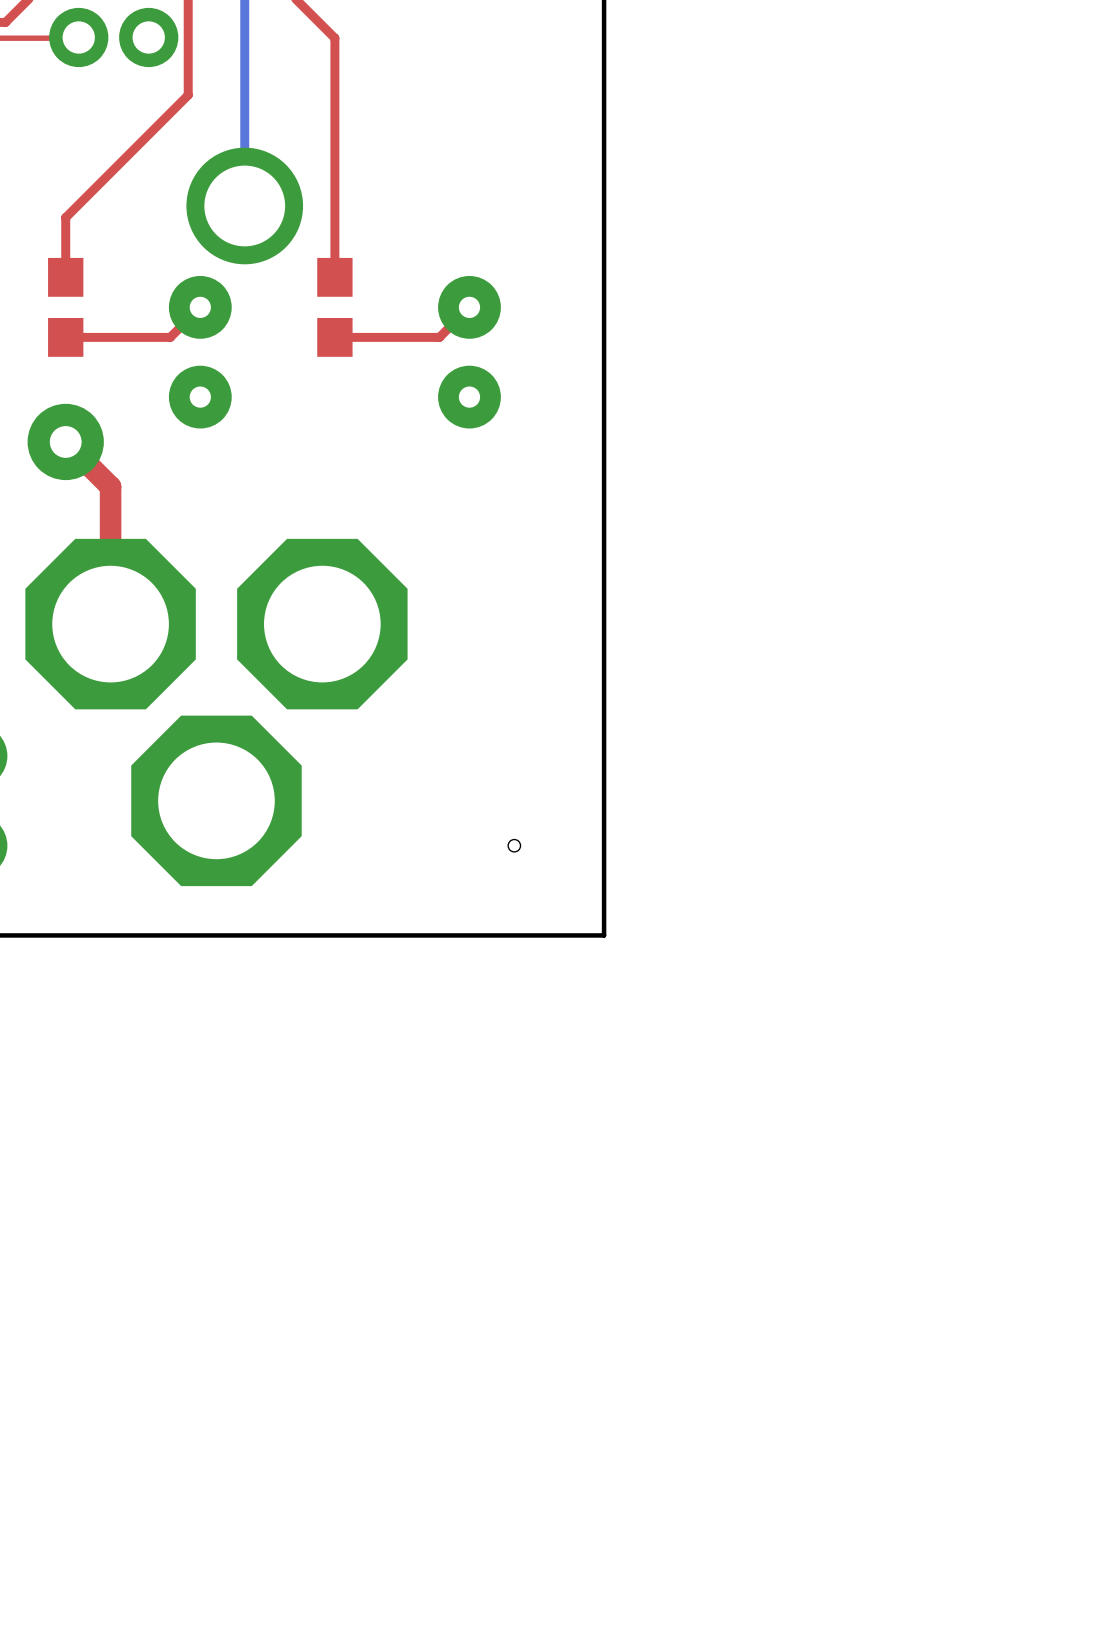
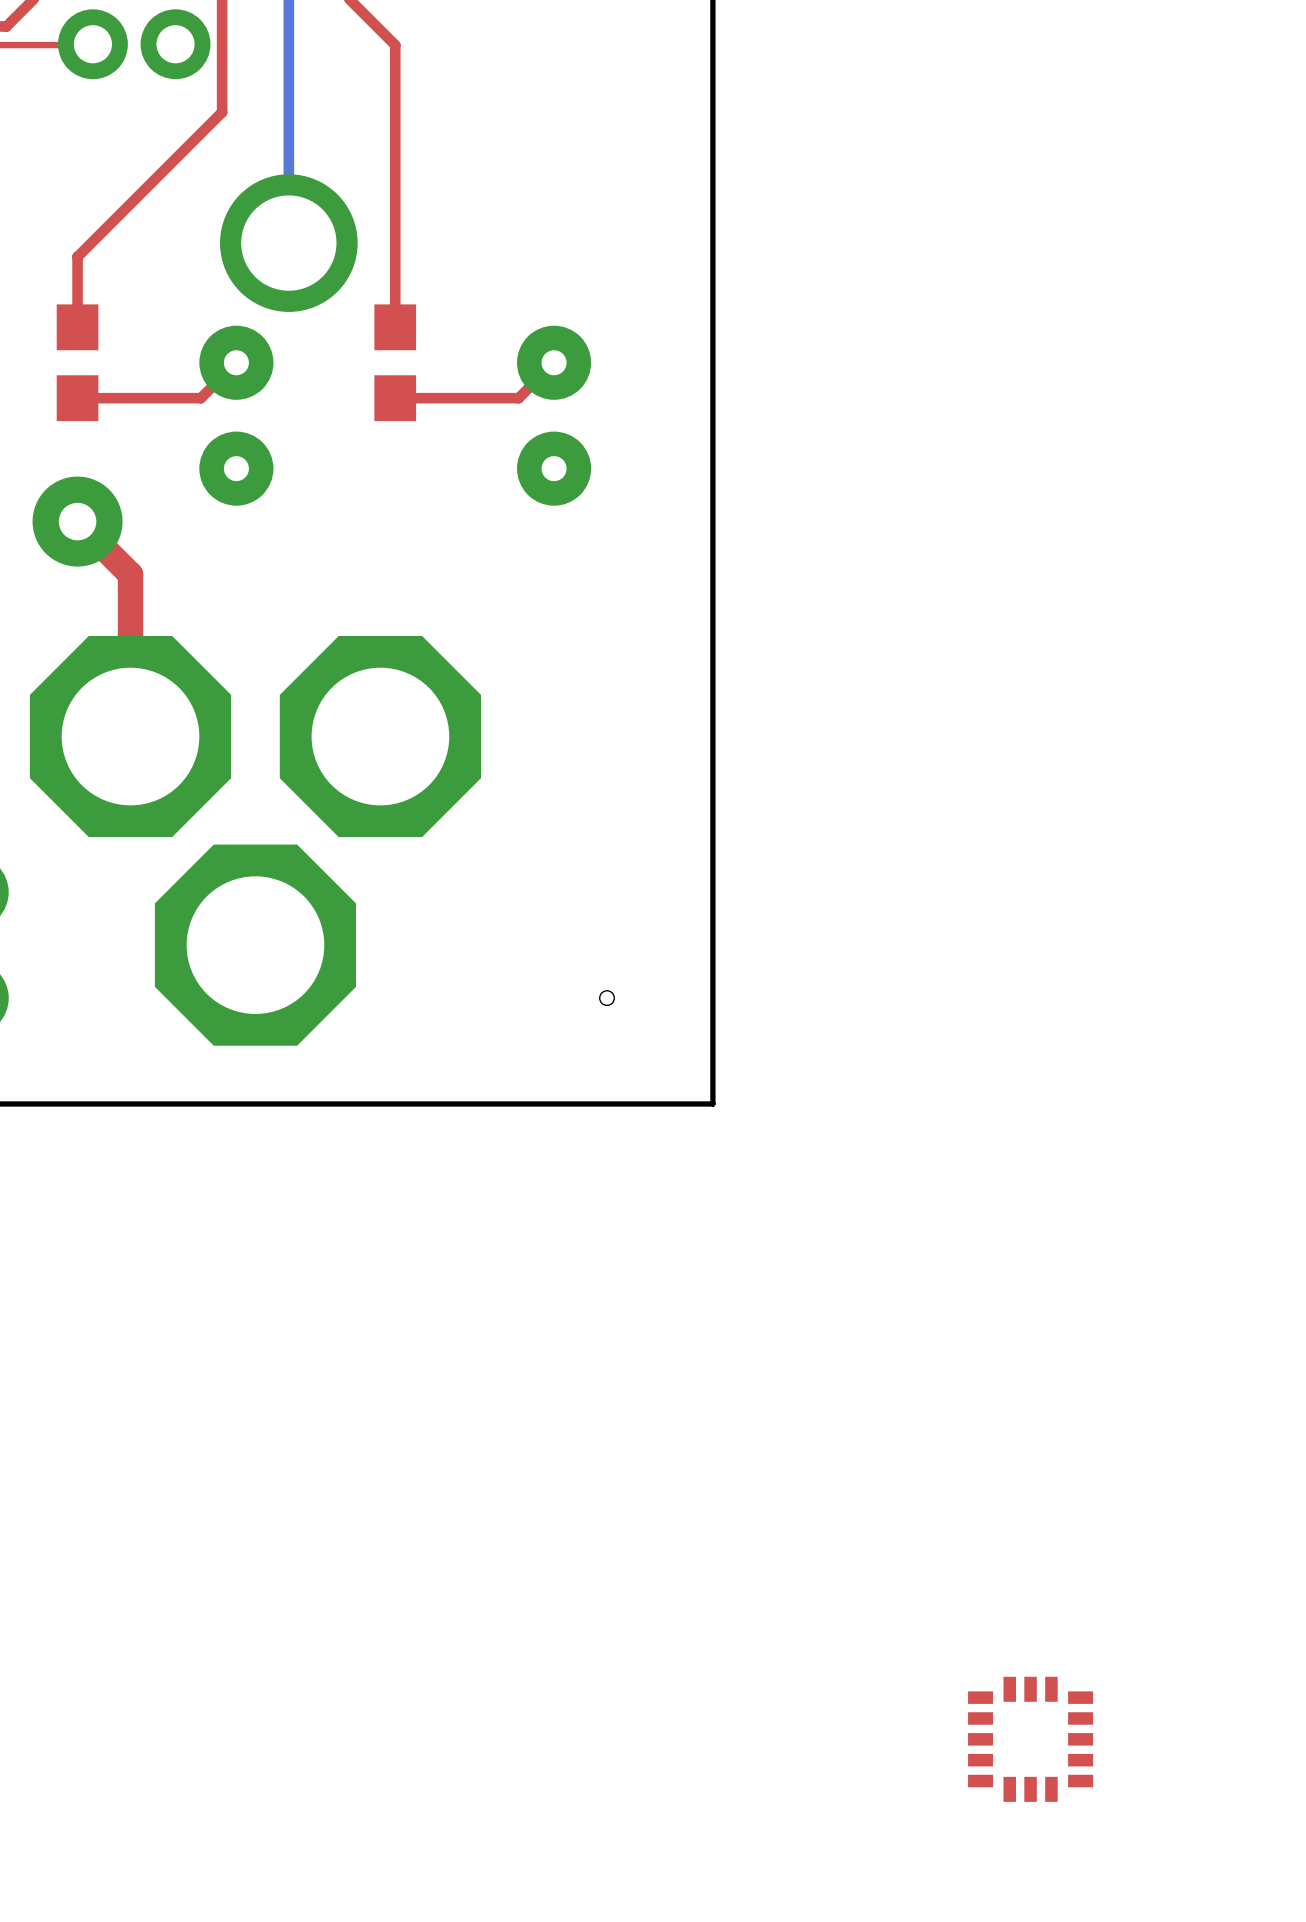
part: none -> (1030, 1739)

